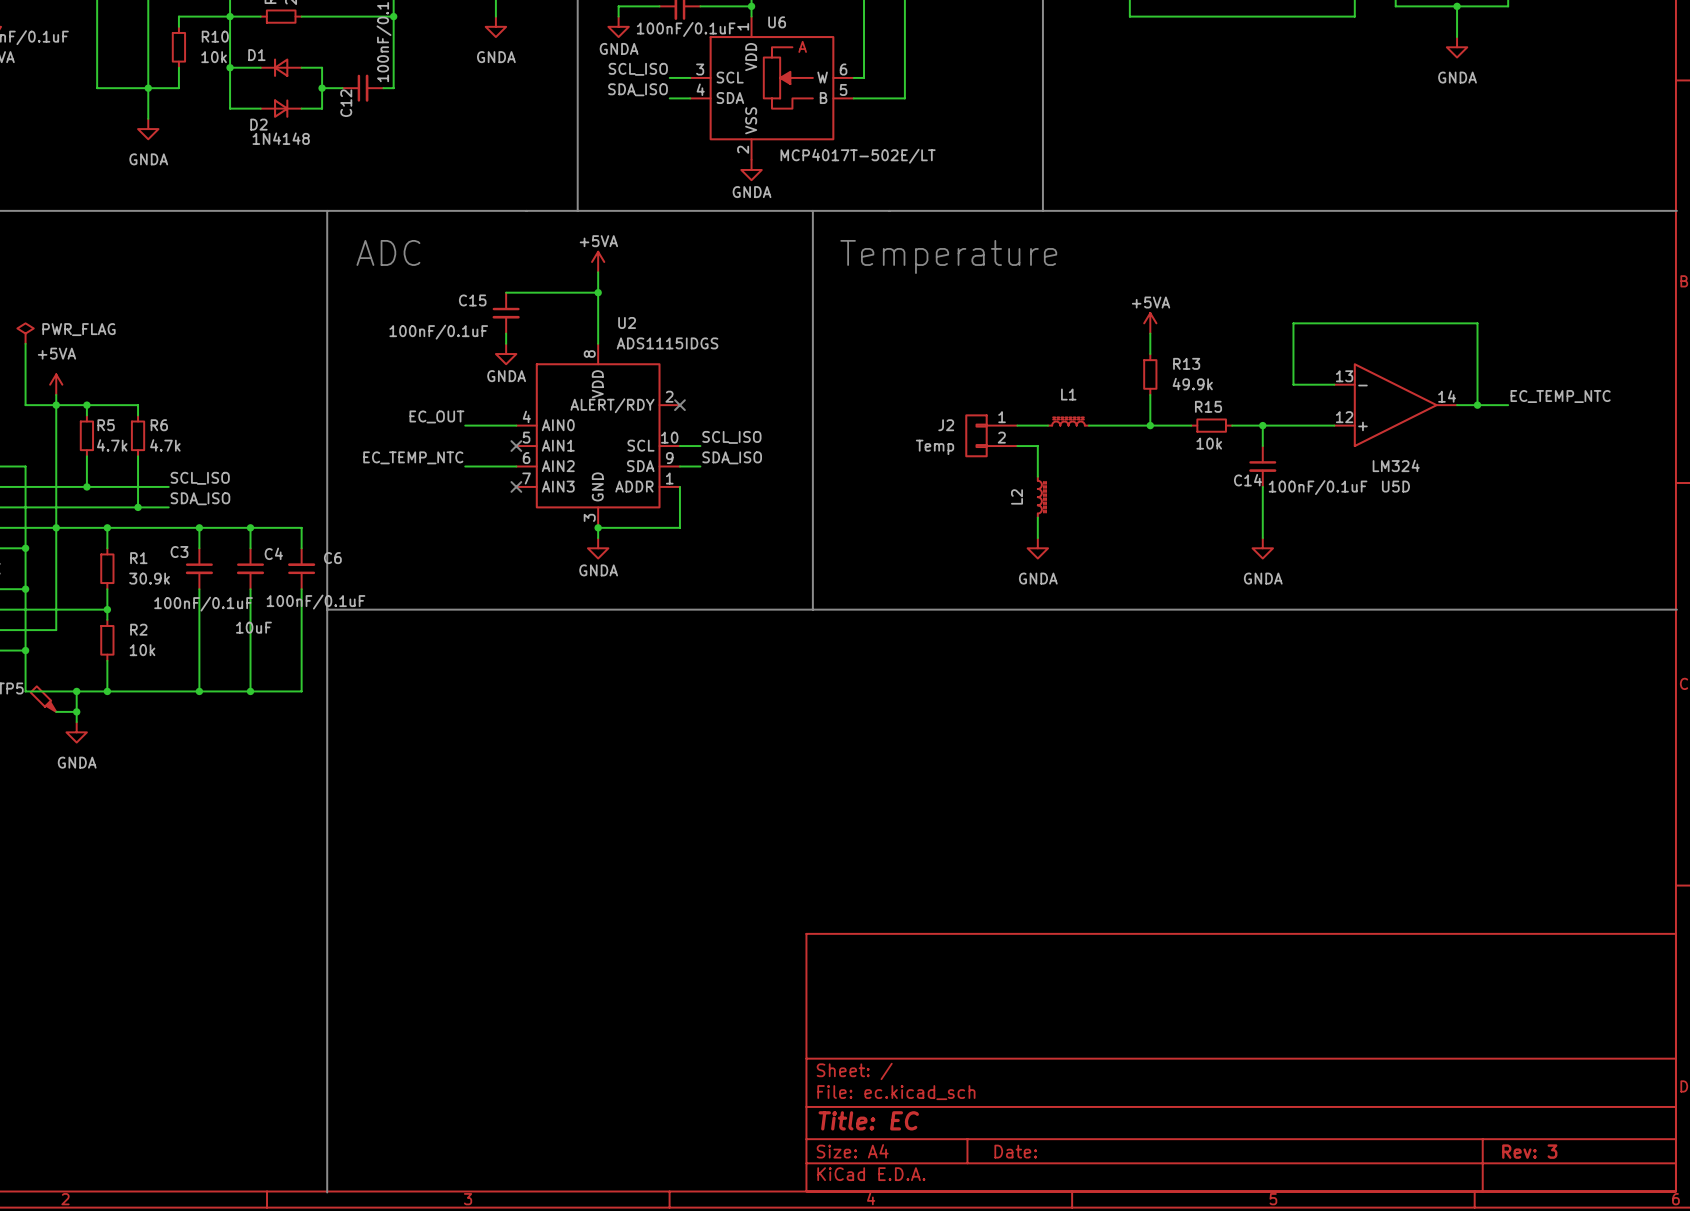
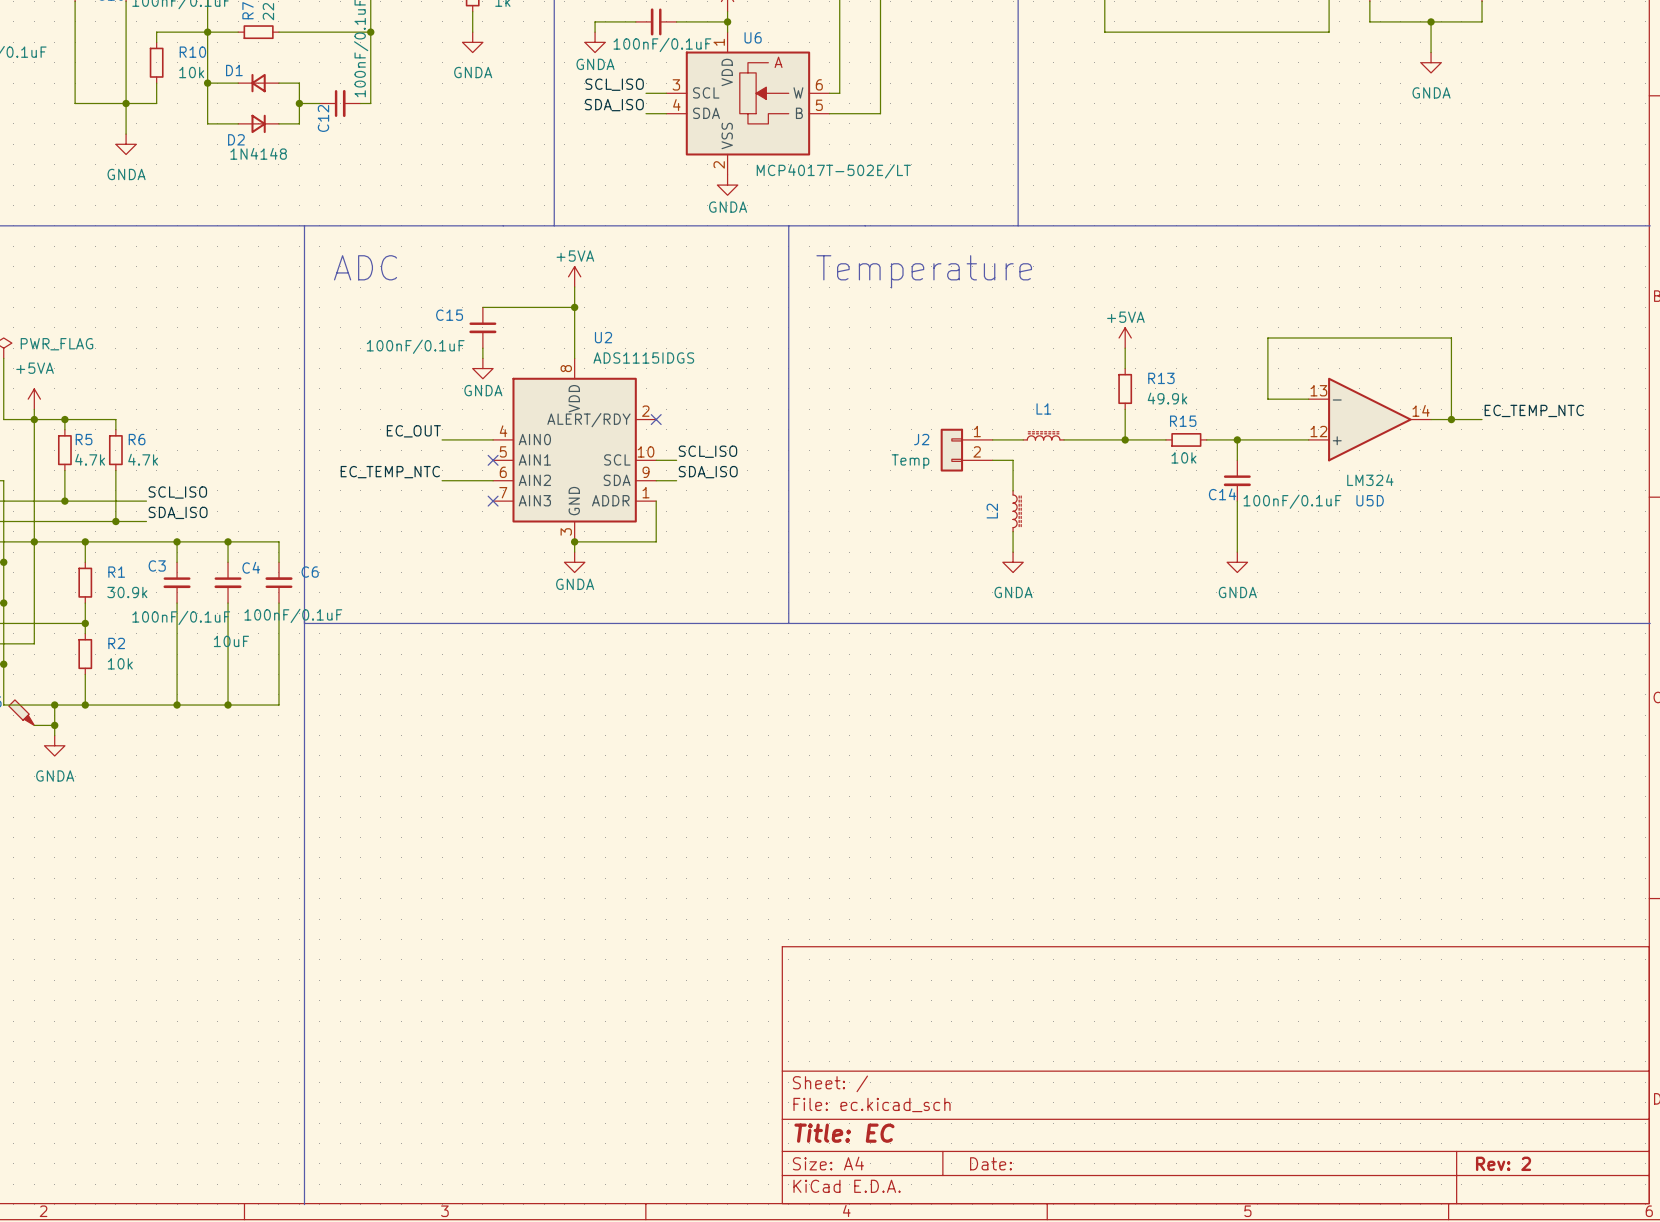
title block: Rev: 3 (1529, 1151) -> Rev: 2 (1503, 1163)

